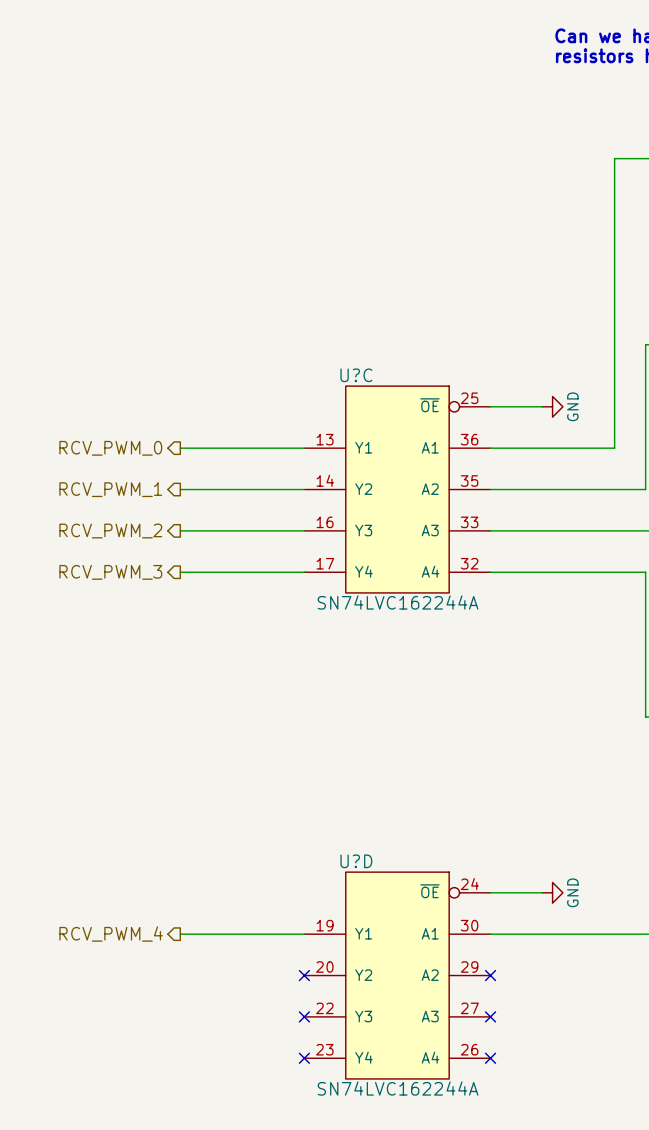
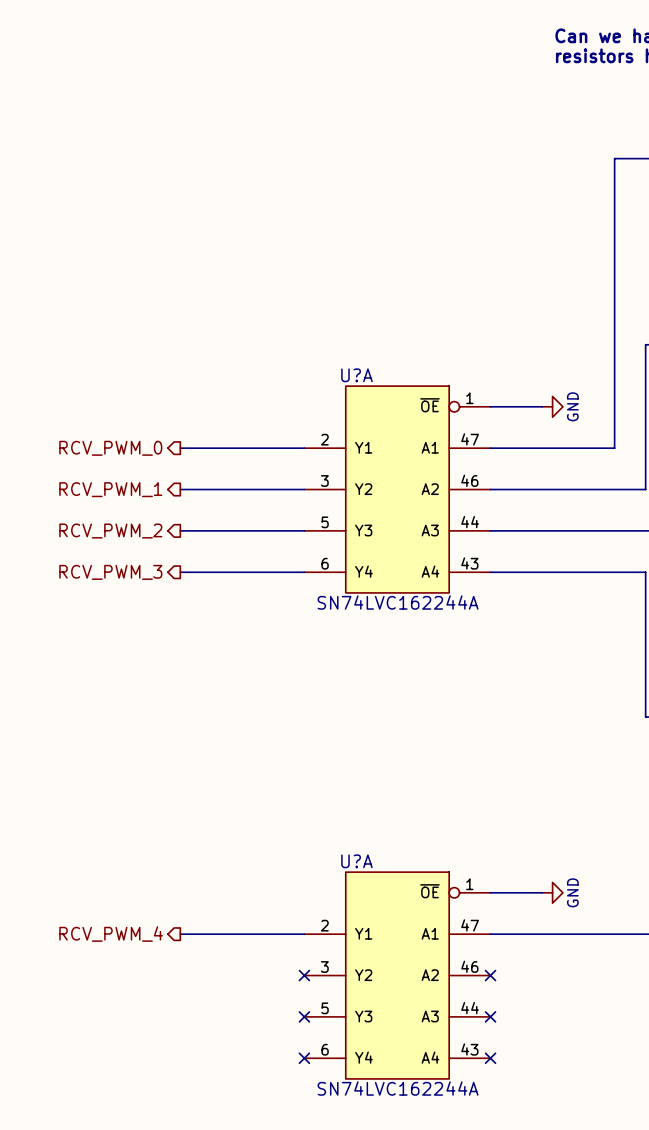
U?C name: U?C (356, 375) -> U?A (356, 375)
U?C symbol: [304, 386, 491, 593] -> [304, 386, 491, 593]
U?D name: U?D (356, 861) -> U?A (356, 861)
U?D symbol: [304, 872, 491, 1079] -> [304, 872, 491, 1079]

